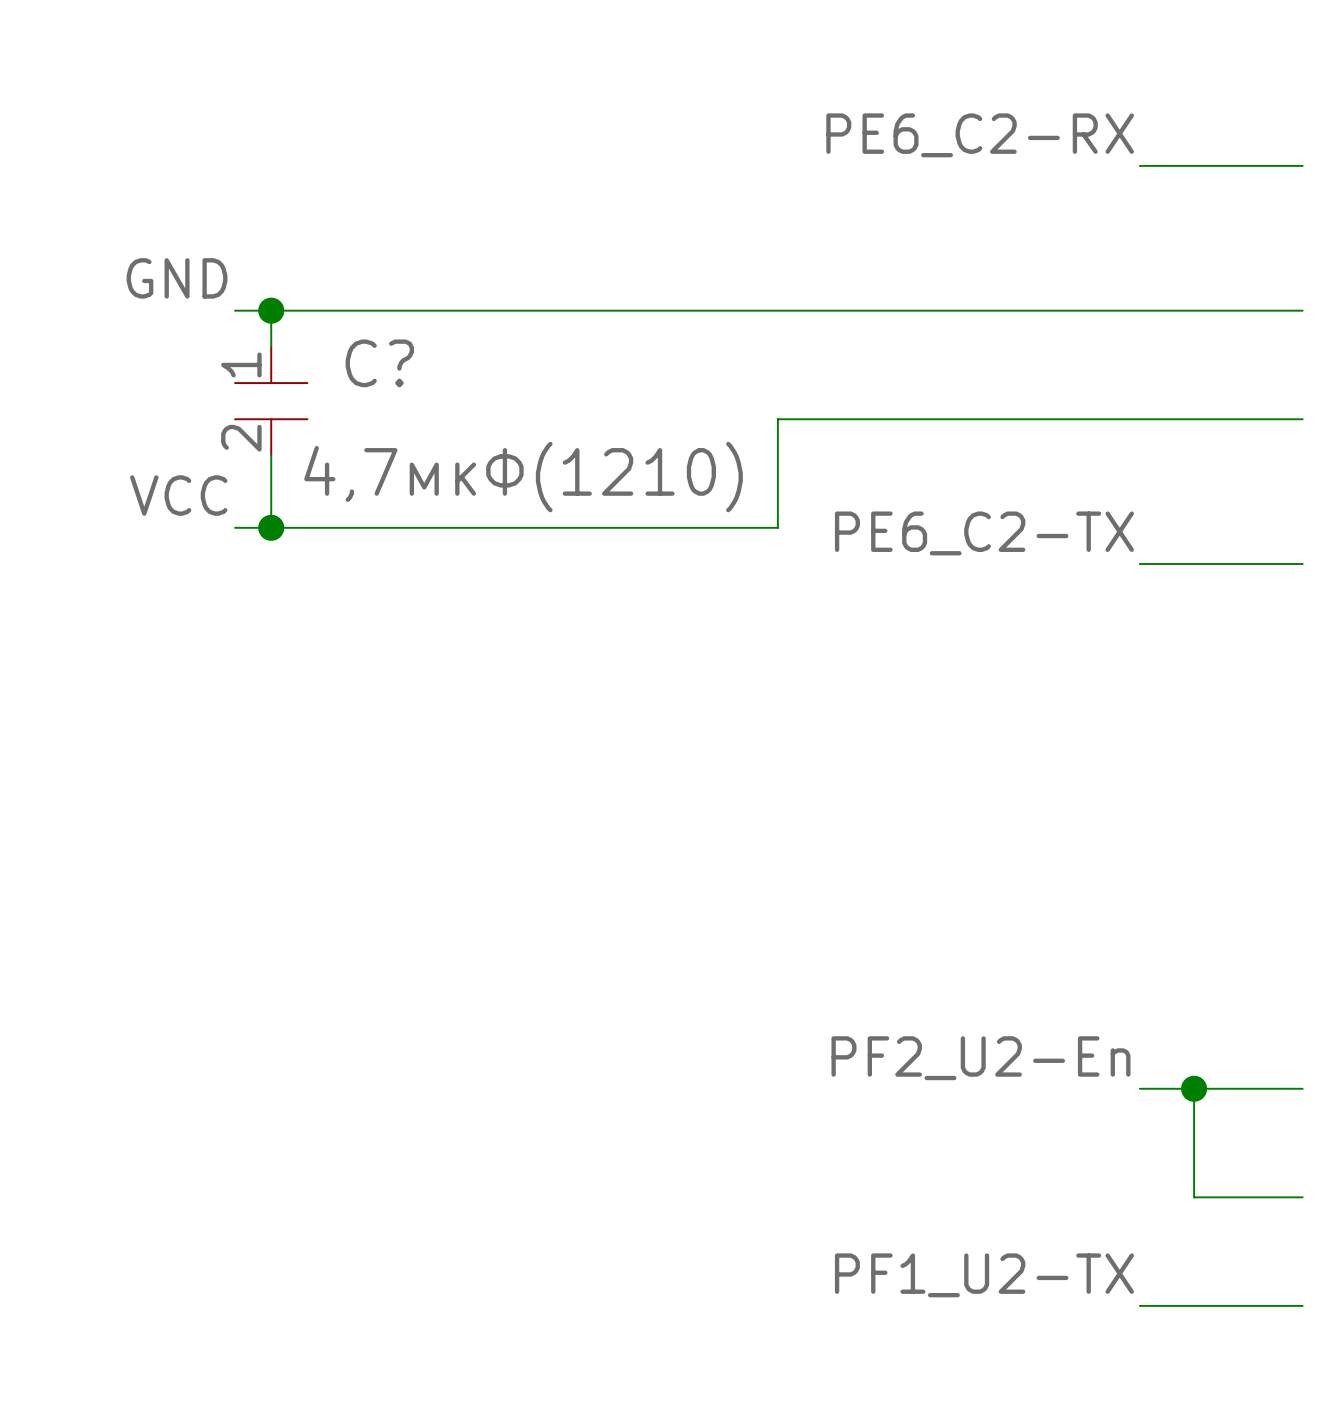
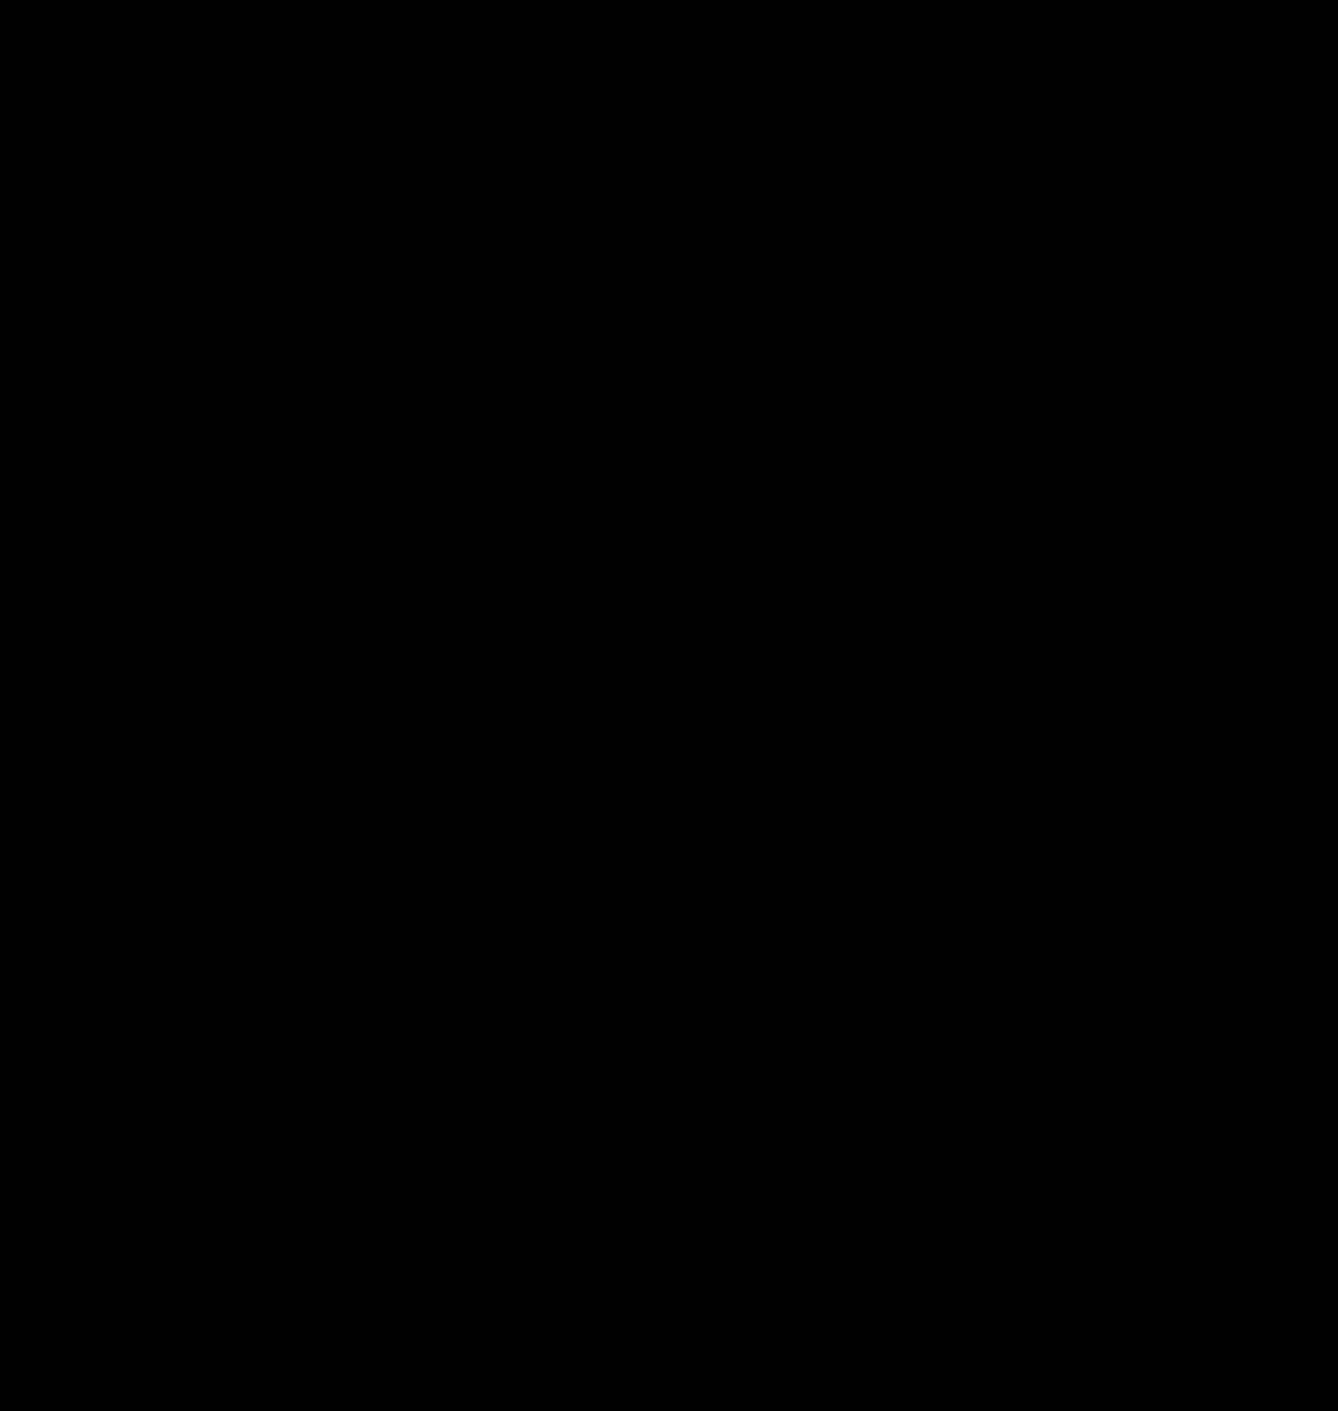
label: PE6_C2-RX (980, 135) -> none
wire: (1139, 165) (1302, 165) -> none
label: GND (177, 278) -> none
wire: (235, 310) (1302, 310) -> none
wire: (271, 310) (271, 346) -> none
junction: (271, 310) -> none
C?: 4,7мкФ(1210) (271, 401) -> none
wire: (1302, 419) (777, 419) (777, 527) (235, 527) -> none
wire: (271, 455) (271, 527) -> none
label: VCC (178, 495) -> none
junction: (271, 527) -> none
label: PE6_C2-TX (984, 533) -> none
wire: (1139, 564) (1302, 564) -> none
label: PF2_U2-En (980, 1058) -> none
wire: (1139, 1088) (1302, 1088) -> none
wire: (1194, 1088) (1194, 1197) (1302, 1197) -> none
junction: (1194, 1088) -> none
label: PF1_U2-TX (984, 1275) -> none
wire: (1139, 1305) (1302, 1305) -> none

